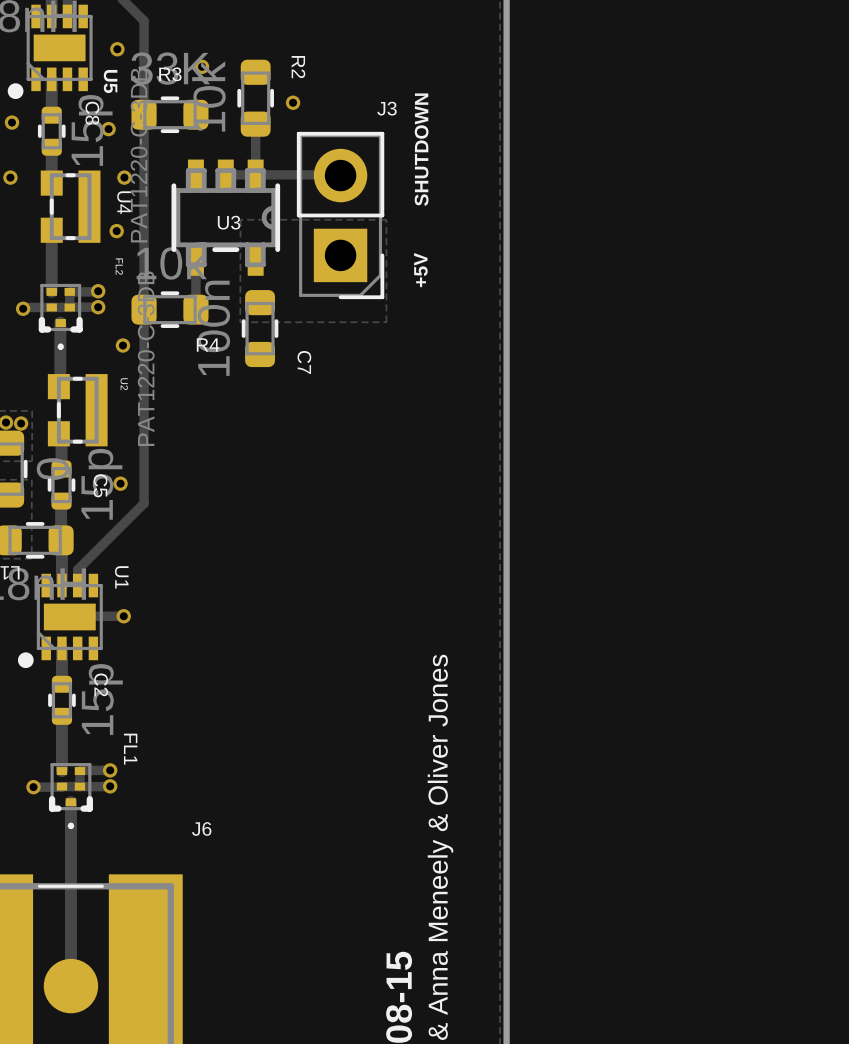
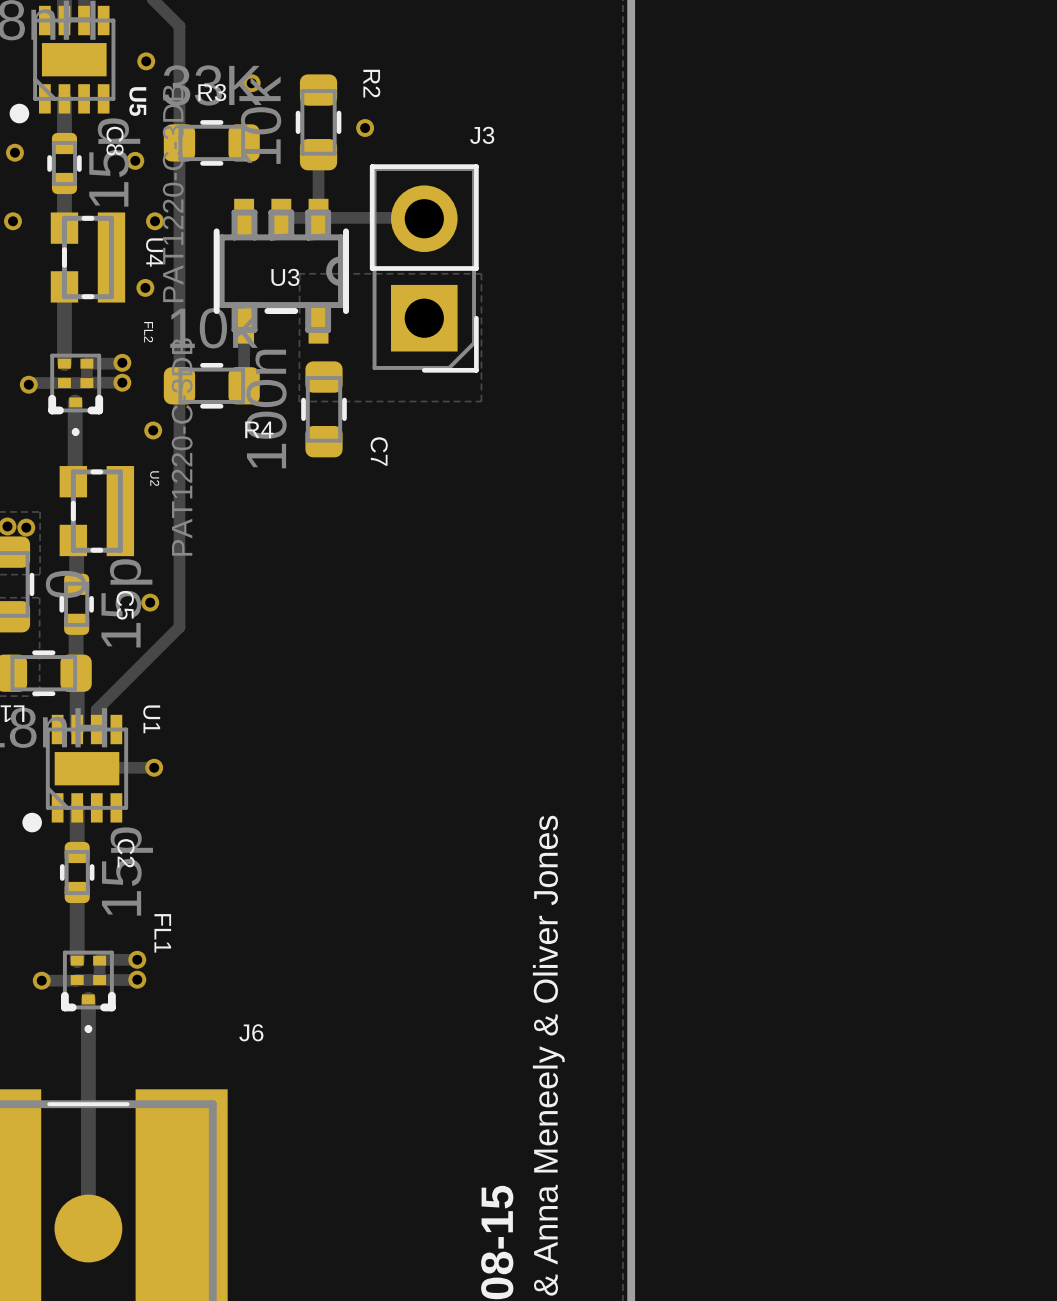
text: SHUTDOWN (421, 149) -> none
text: +5V (420, 270) -> none

